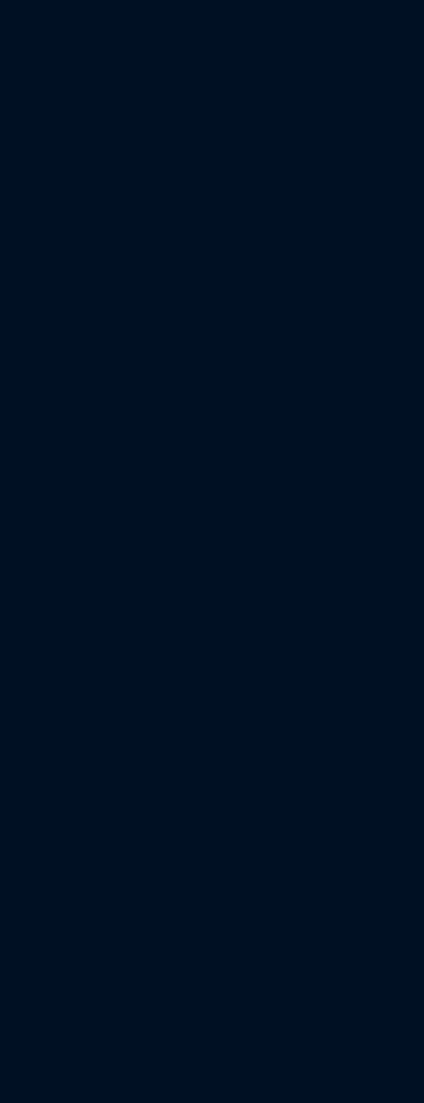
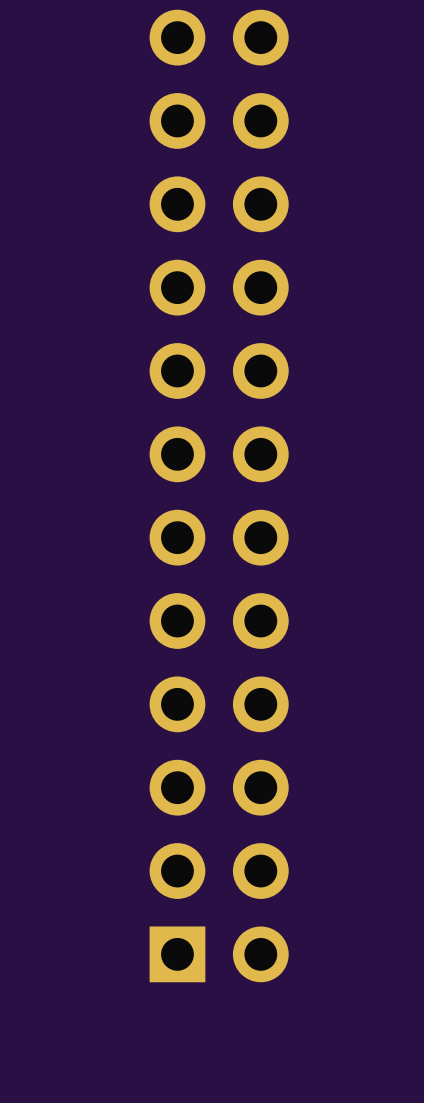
part: none -> (219, 495)

